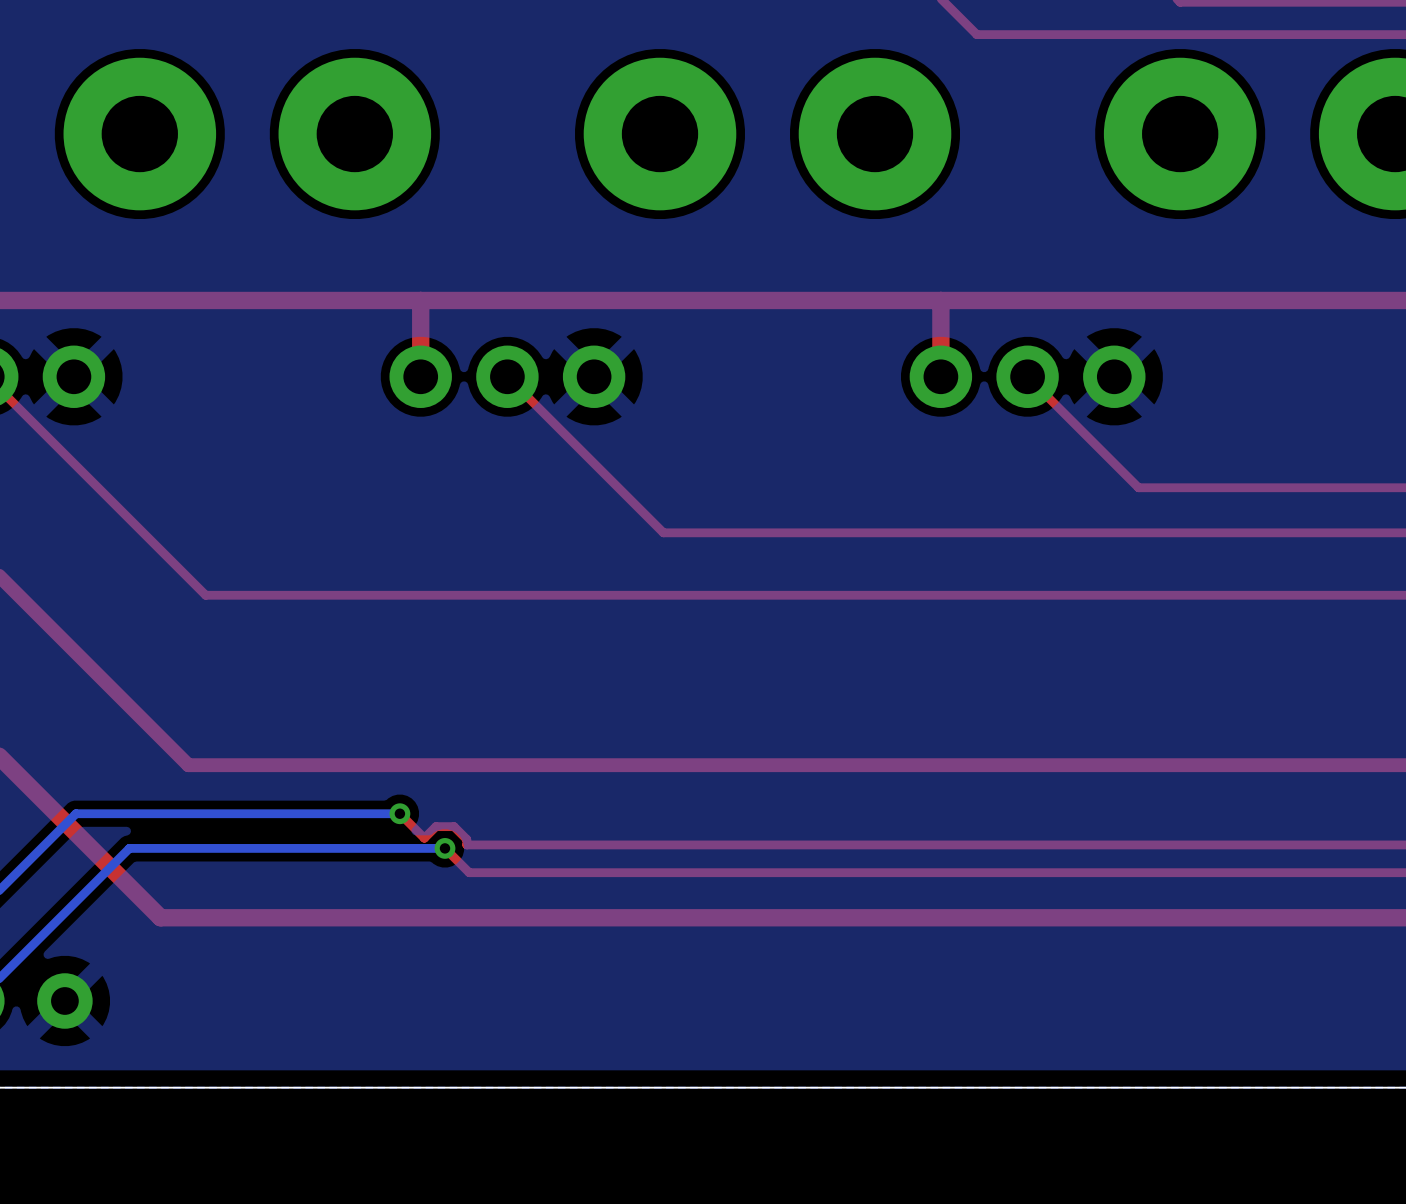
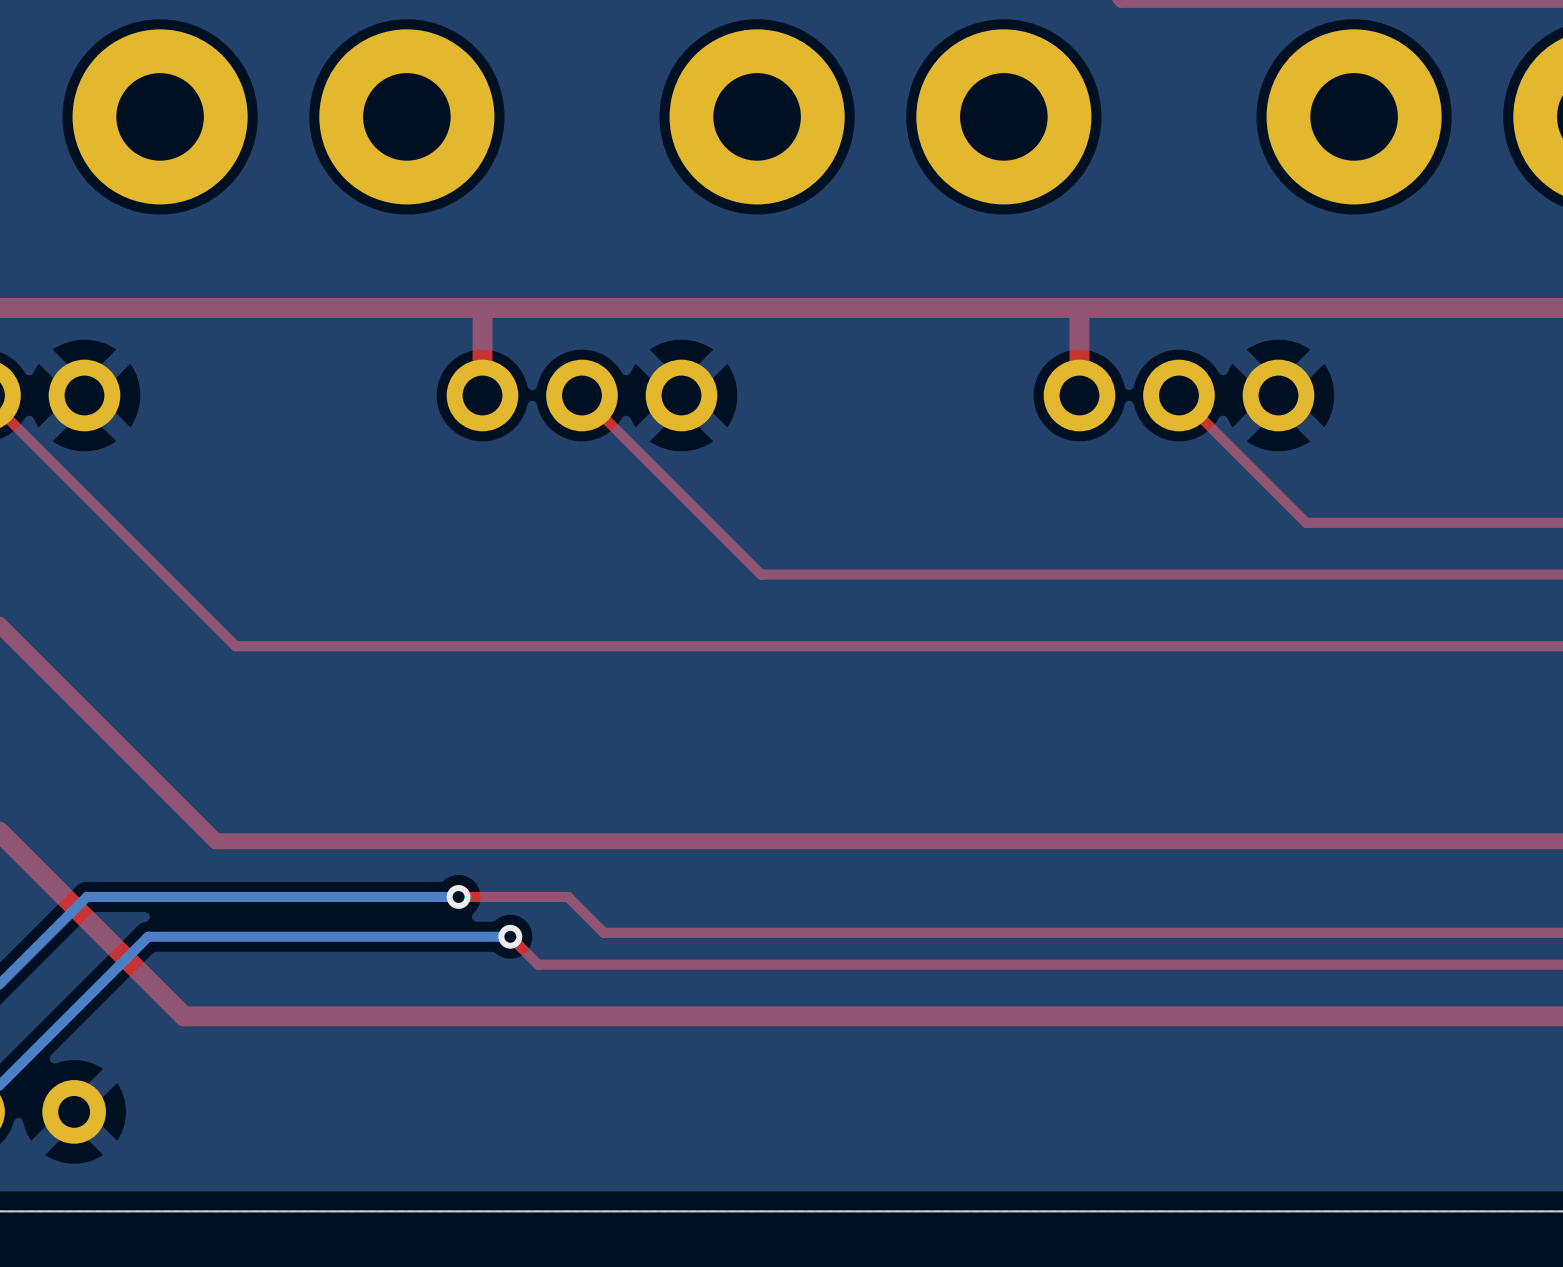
top track: (399, 813) (424, 838) (435, 826) (454, 826) (466, 839) (466, 844) (526, 844) -> (458, 896) (568, 896) (603, 932)

